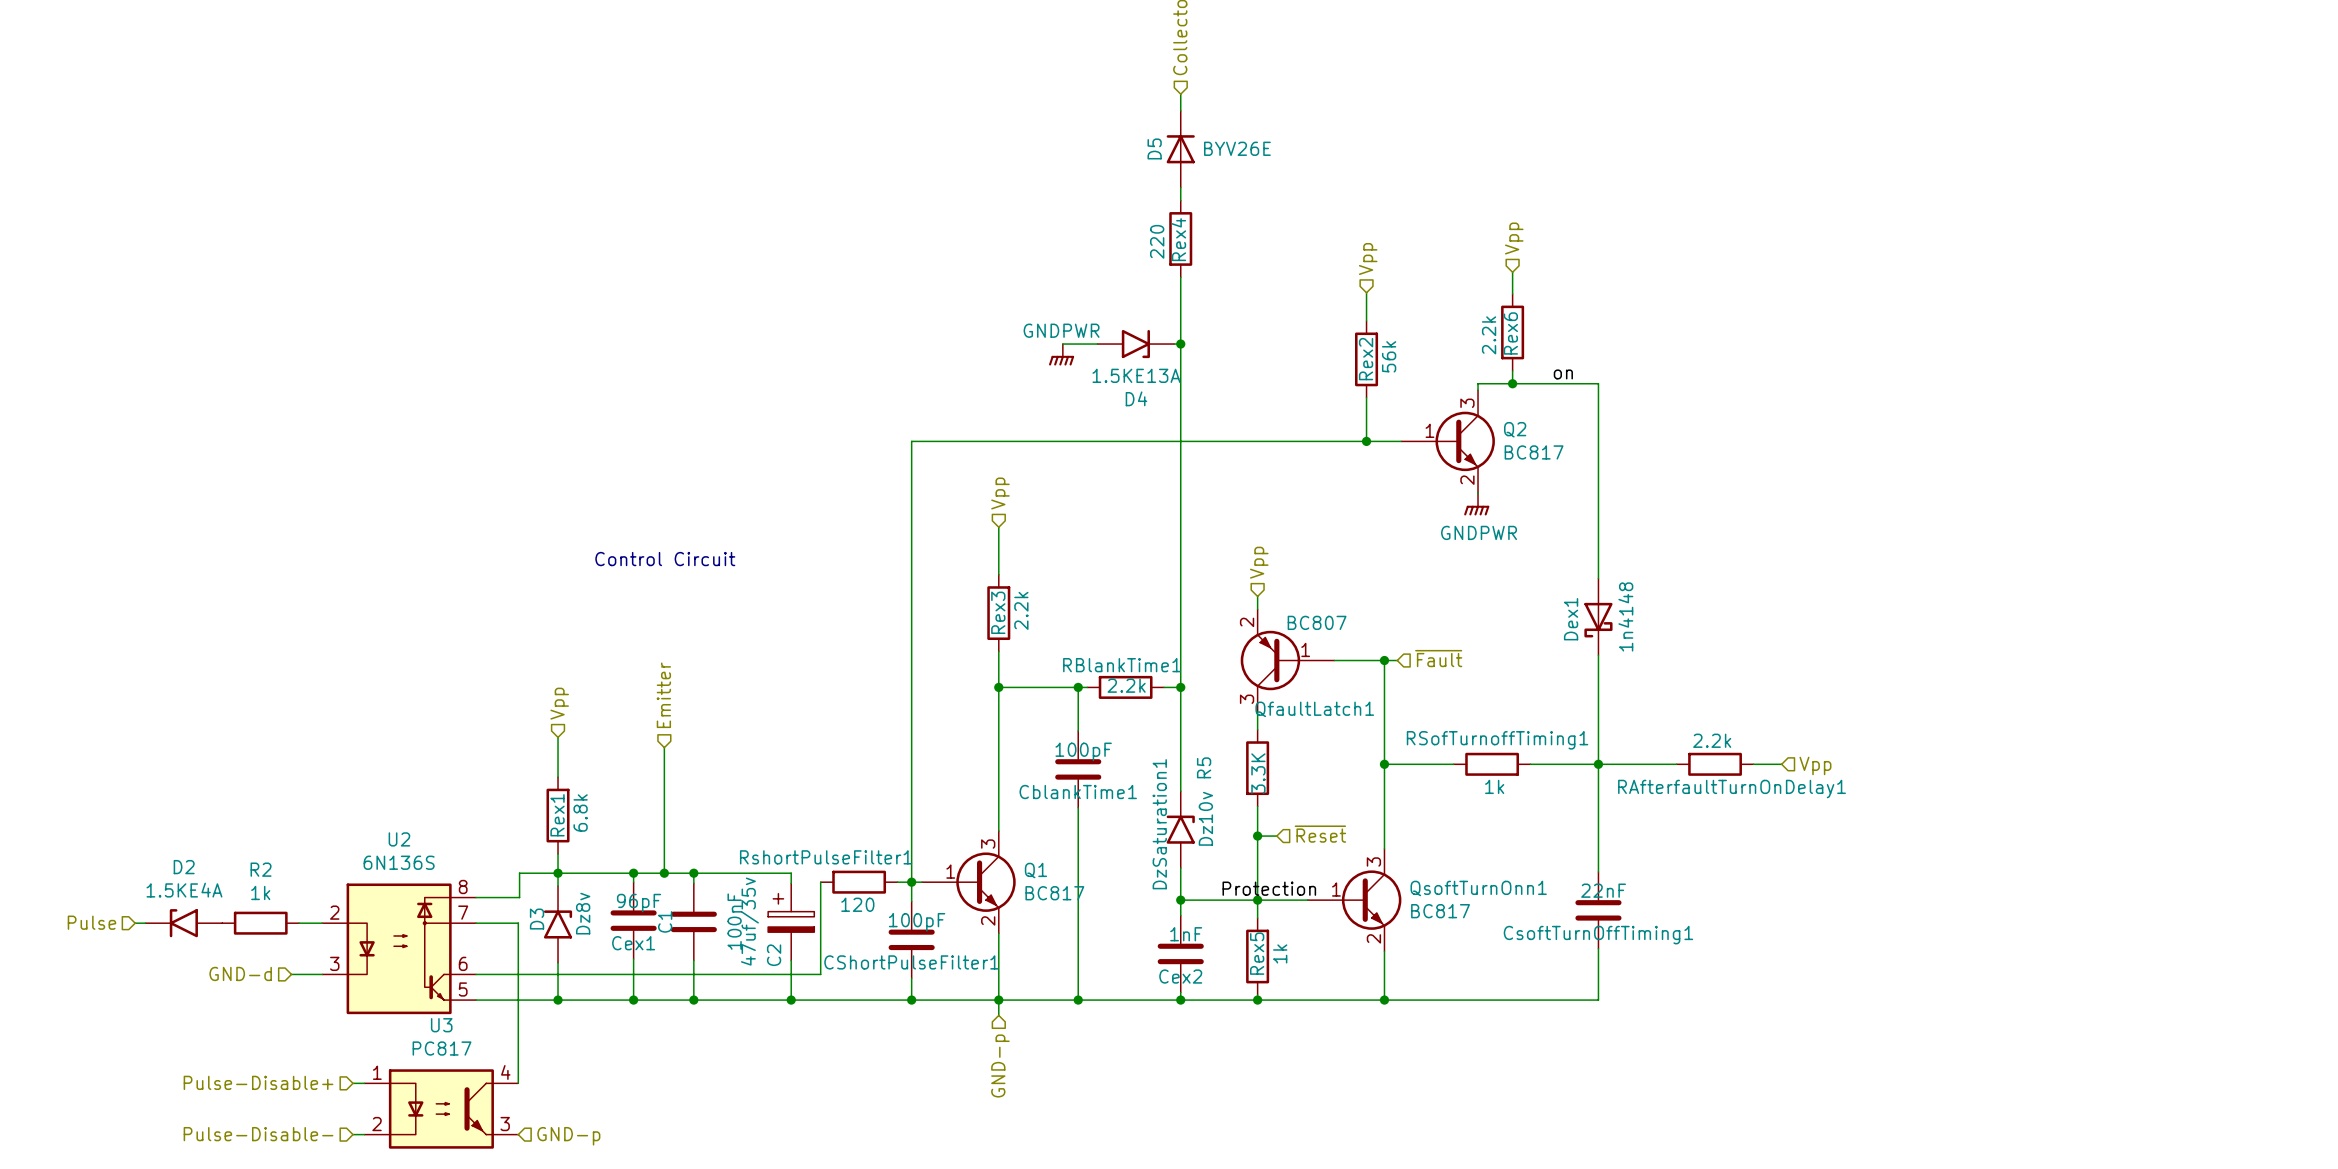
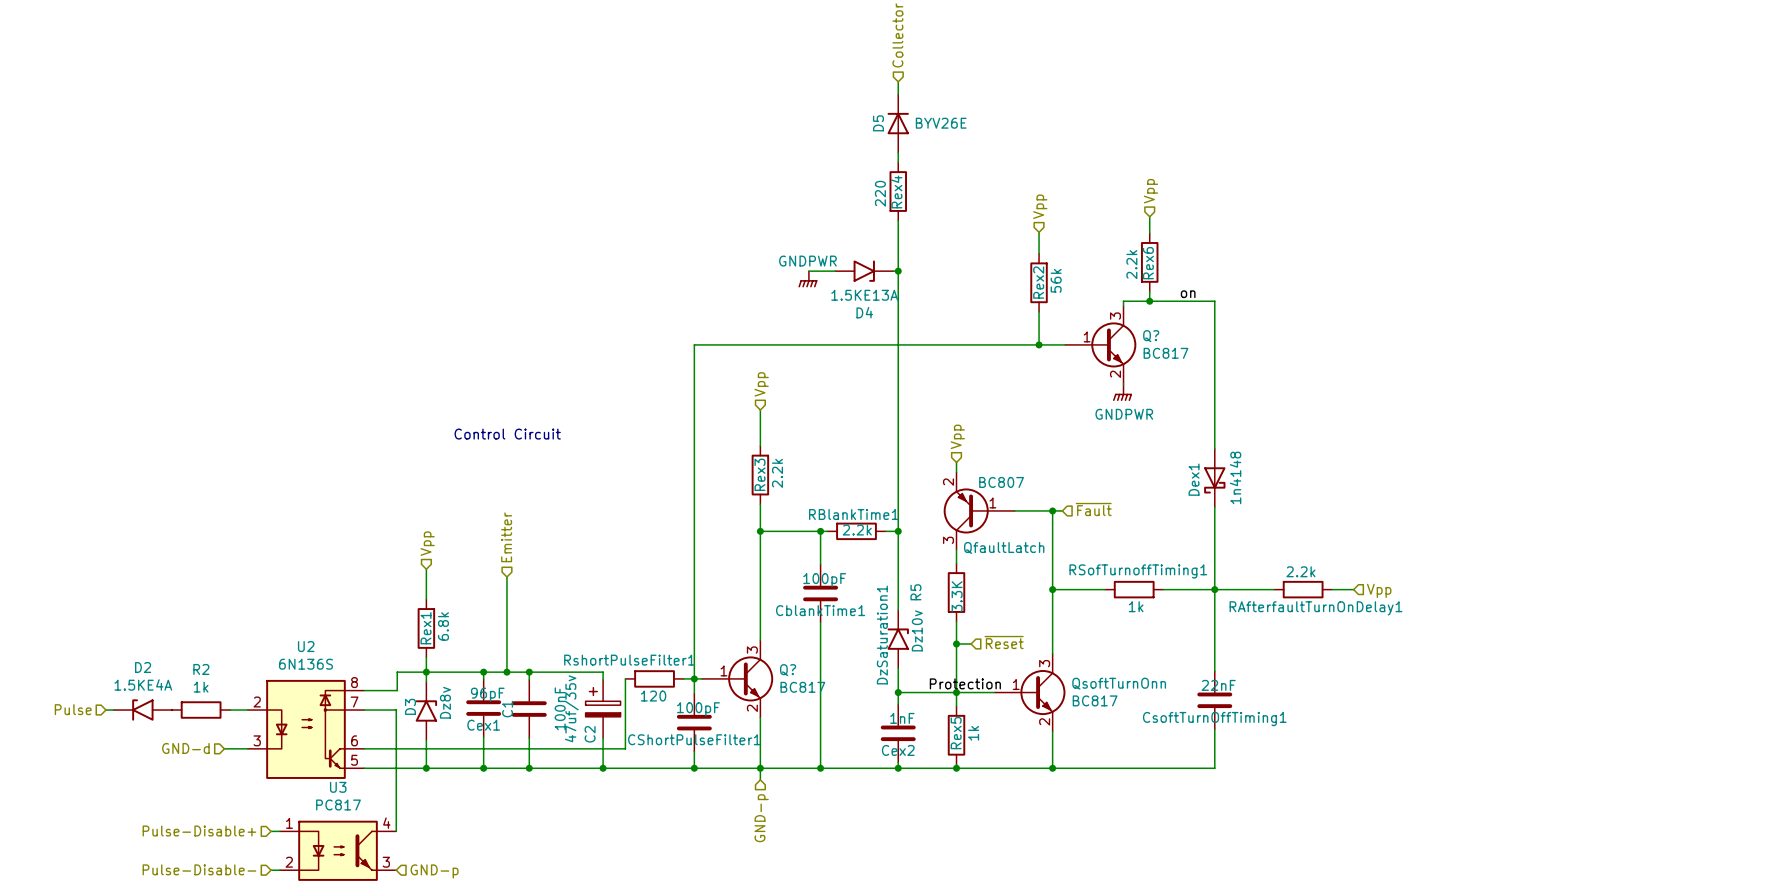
Q2 name: Q2 (1515, 429) -> Q? (1151, 336)
QfaultLatch1 name: QfaultLatch1 (1314, 709) -> QfaultLatch (1004, 547)
Q1 name: Q1 (1035, 870) -> Q? (788, 670)
QsoftTurnOnn1 name: QsoftTurnOnn1 (1478, 888) -> QsoftTurnOnn (1119, 683)

